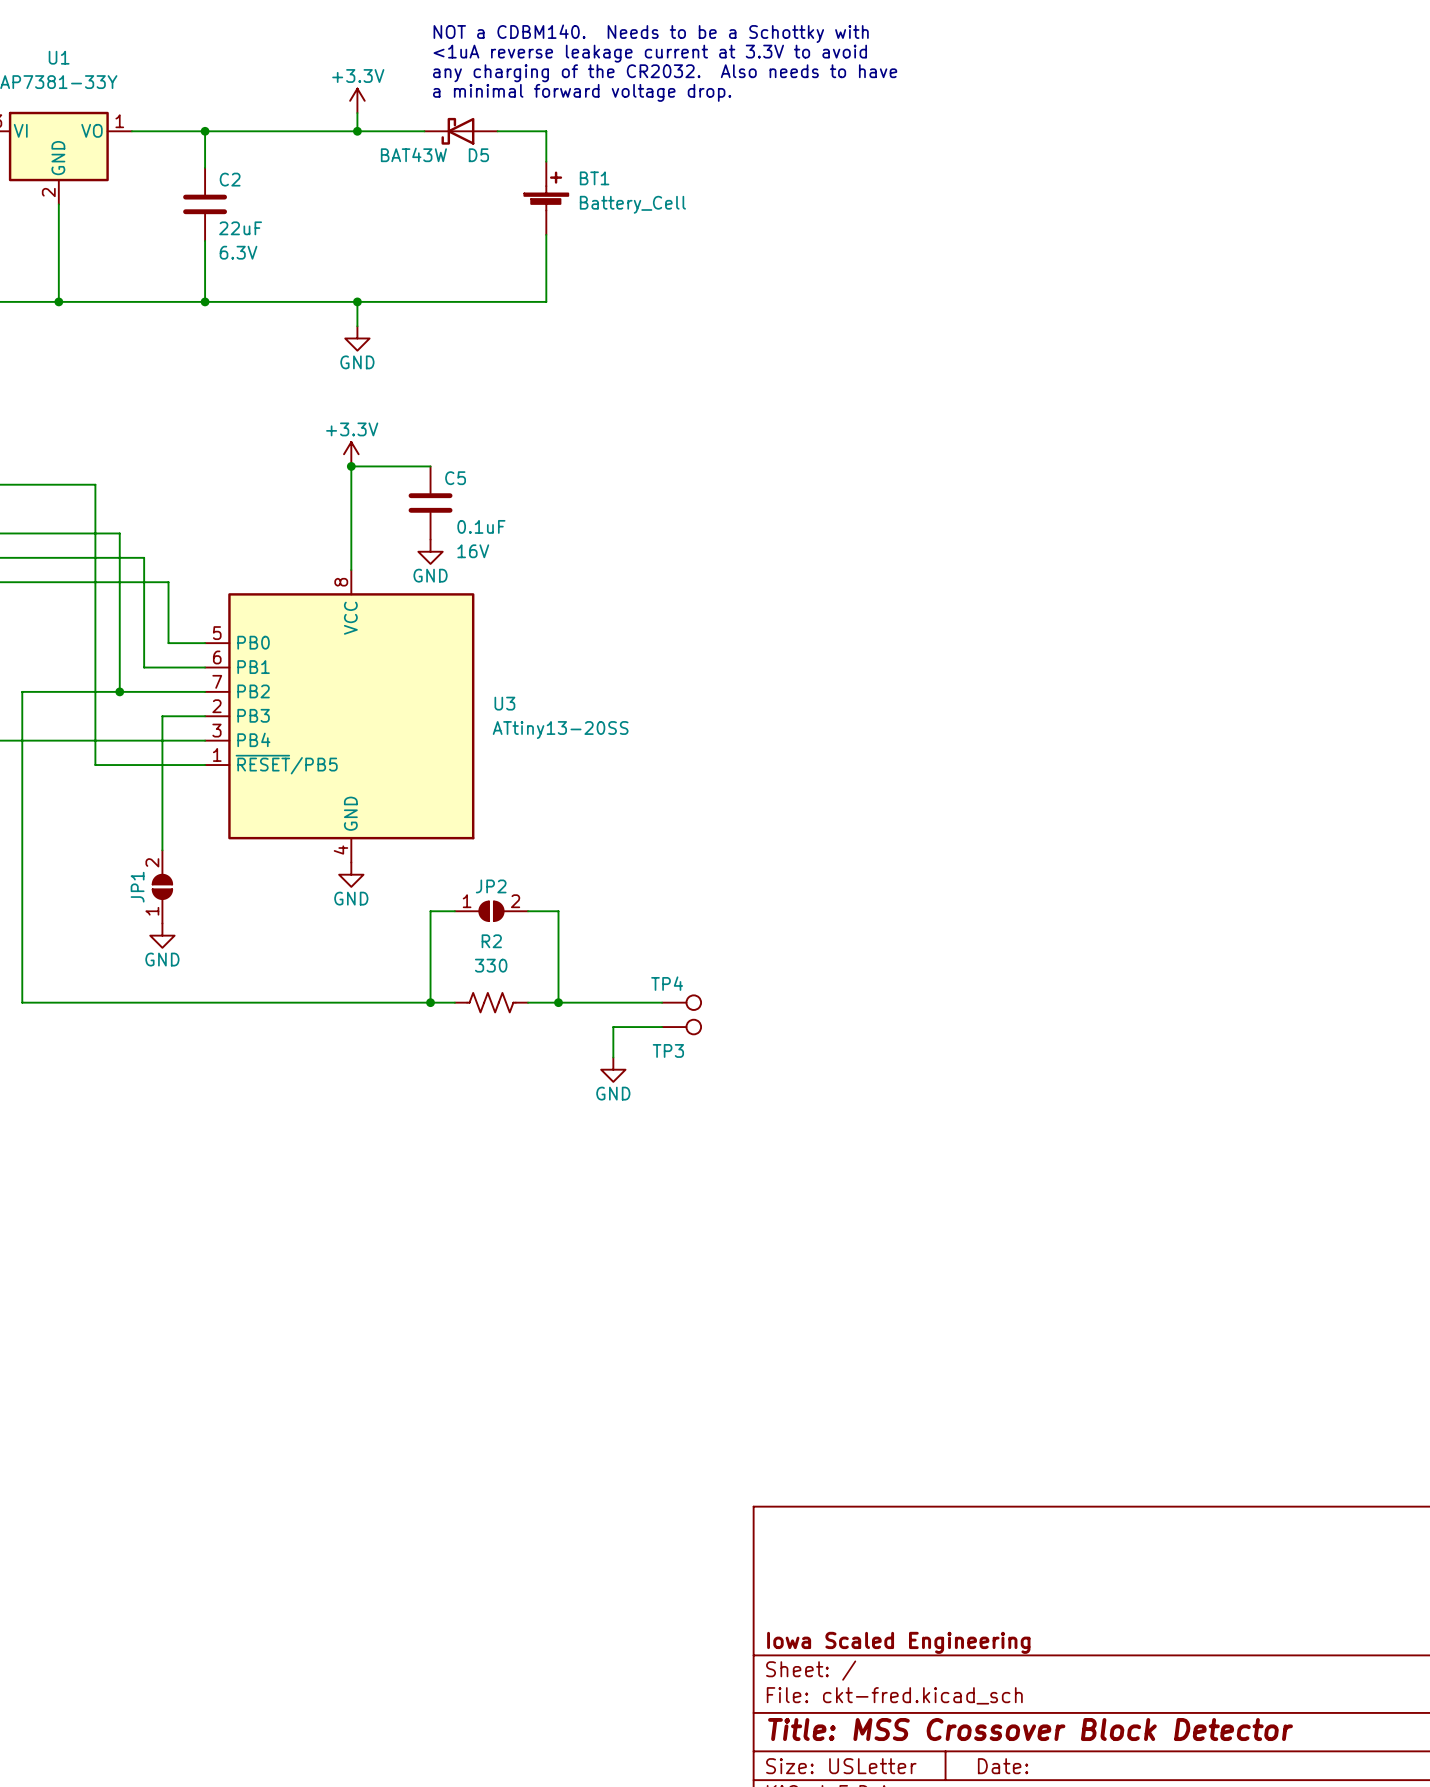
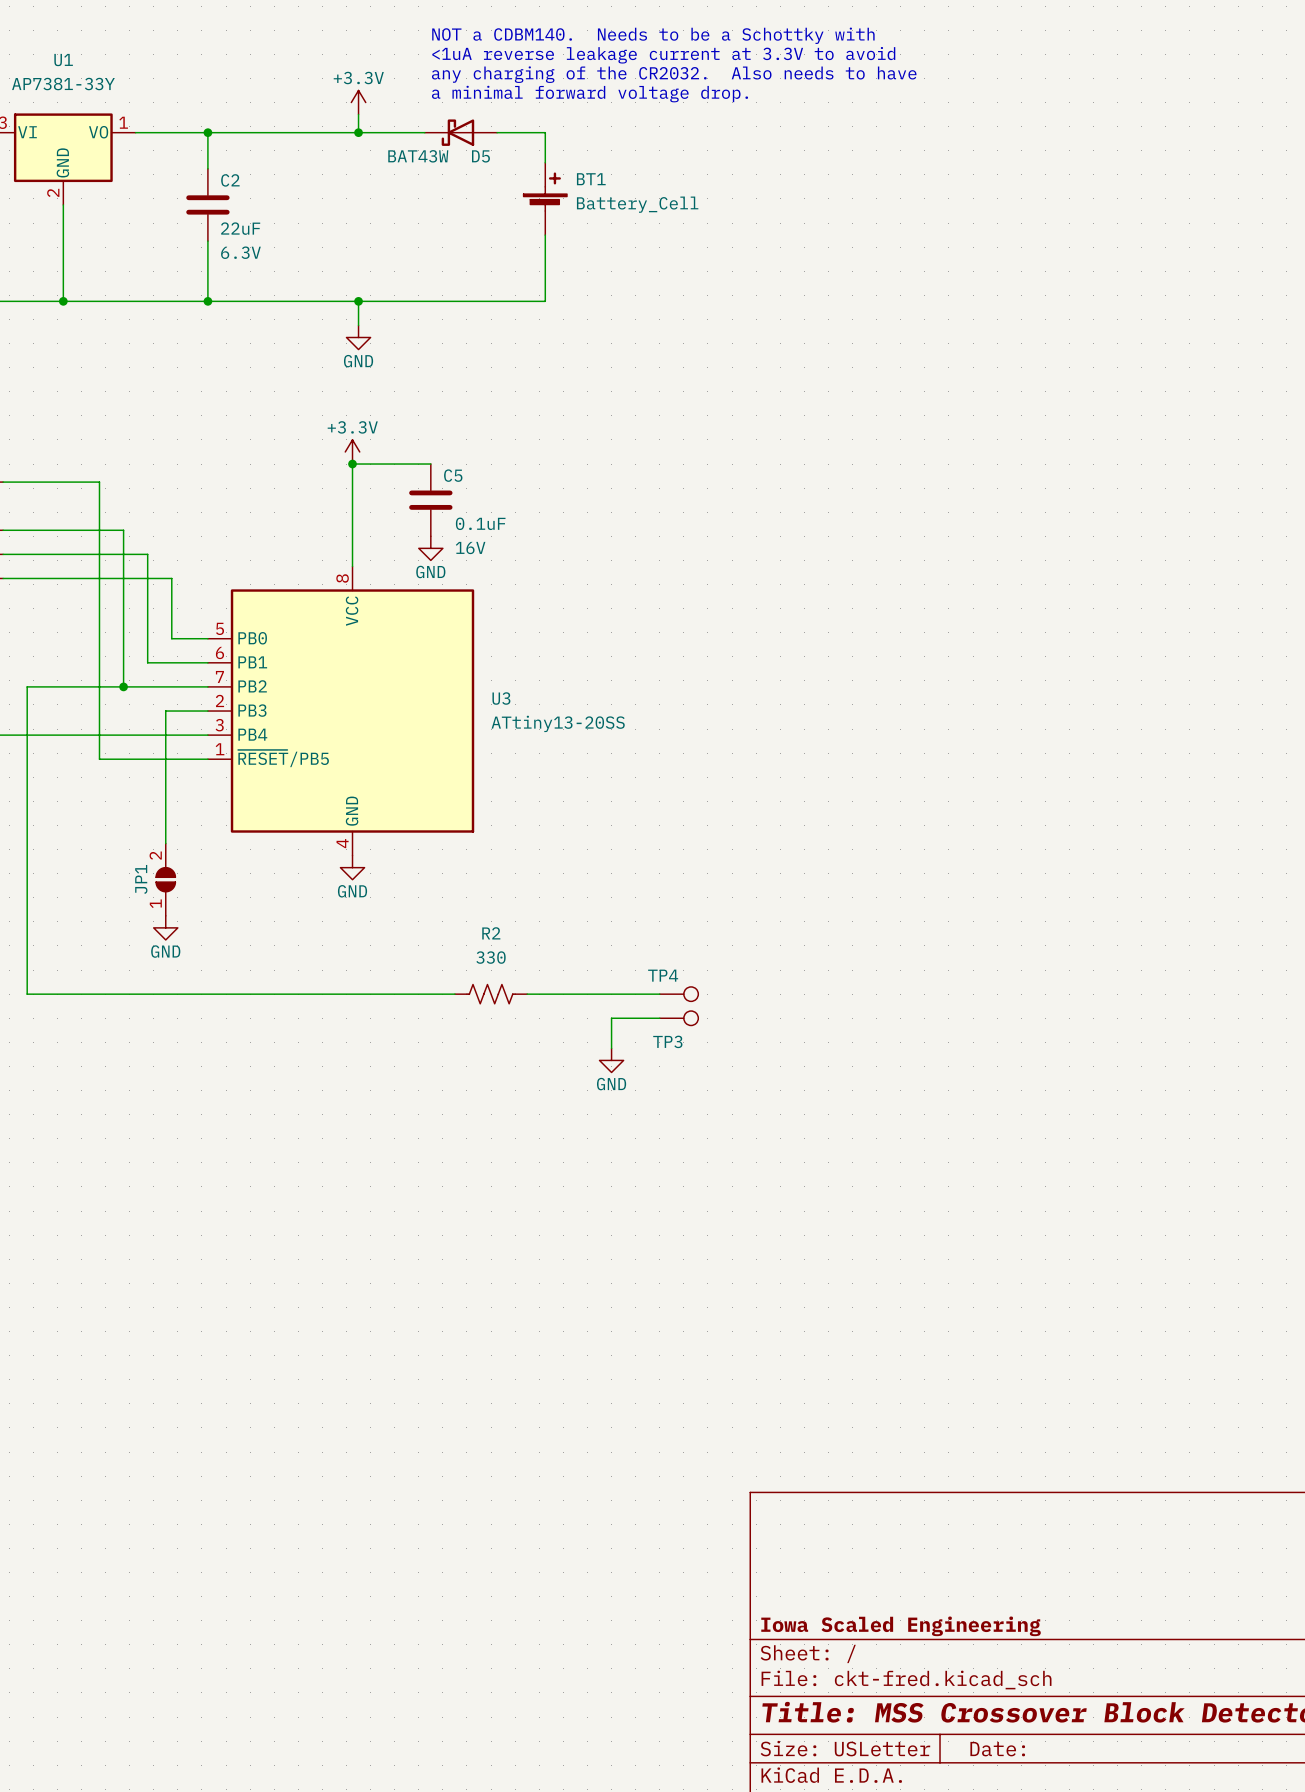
wire: (454, 911) (430, 911) (430, 1002) -> none
JP2: (491, 911) -> none
wire: (528, 911) (558, 911) (558, 1002) -> none
junction: (430, 1002) -> none
junction: (558, 1002) -> none

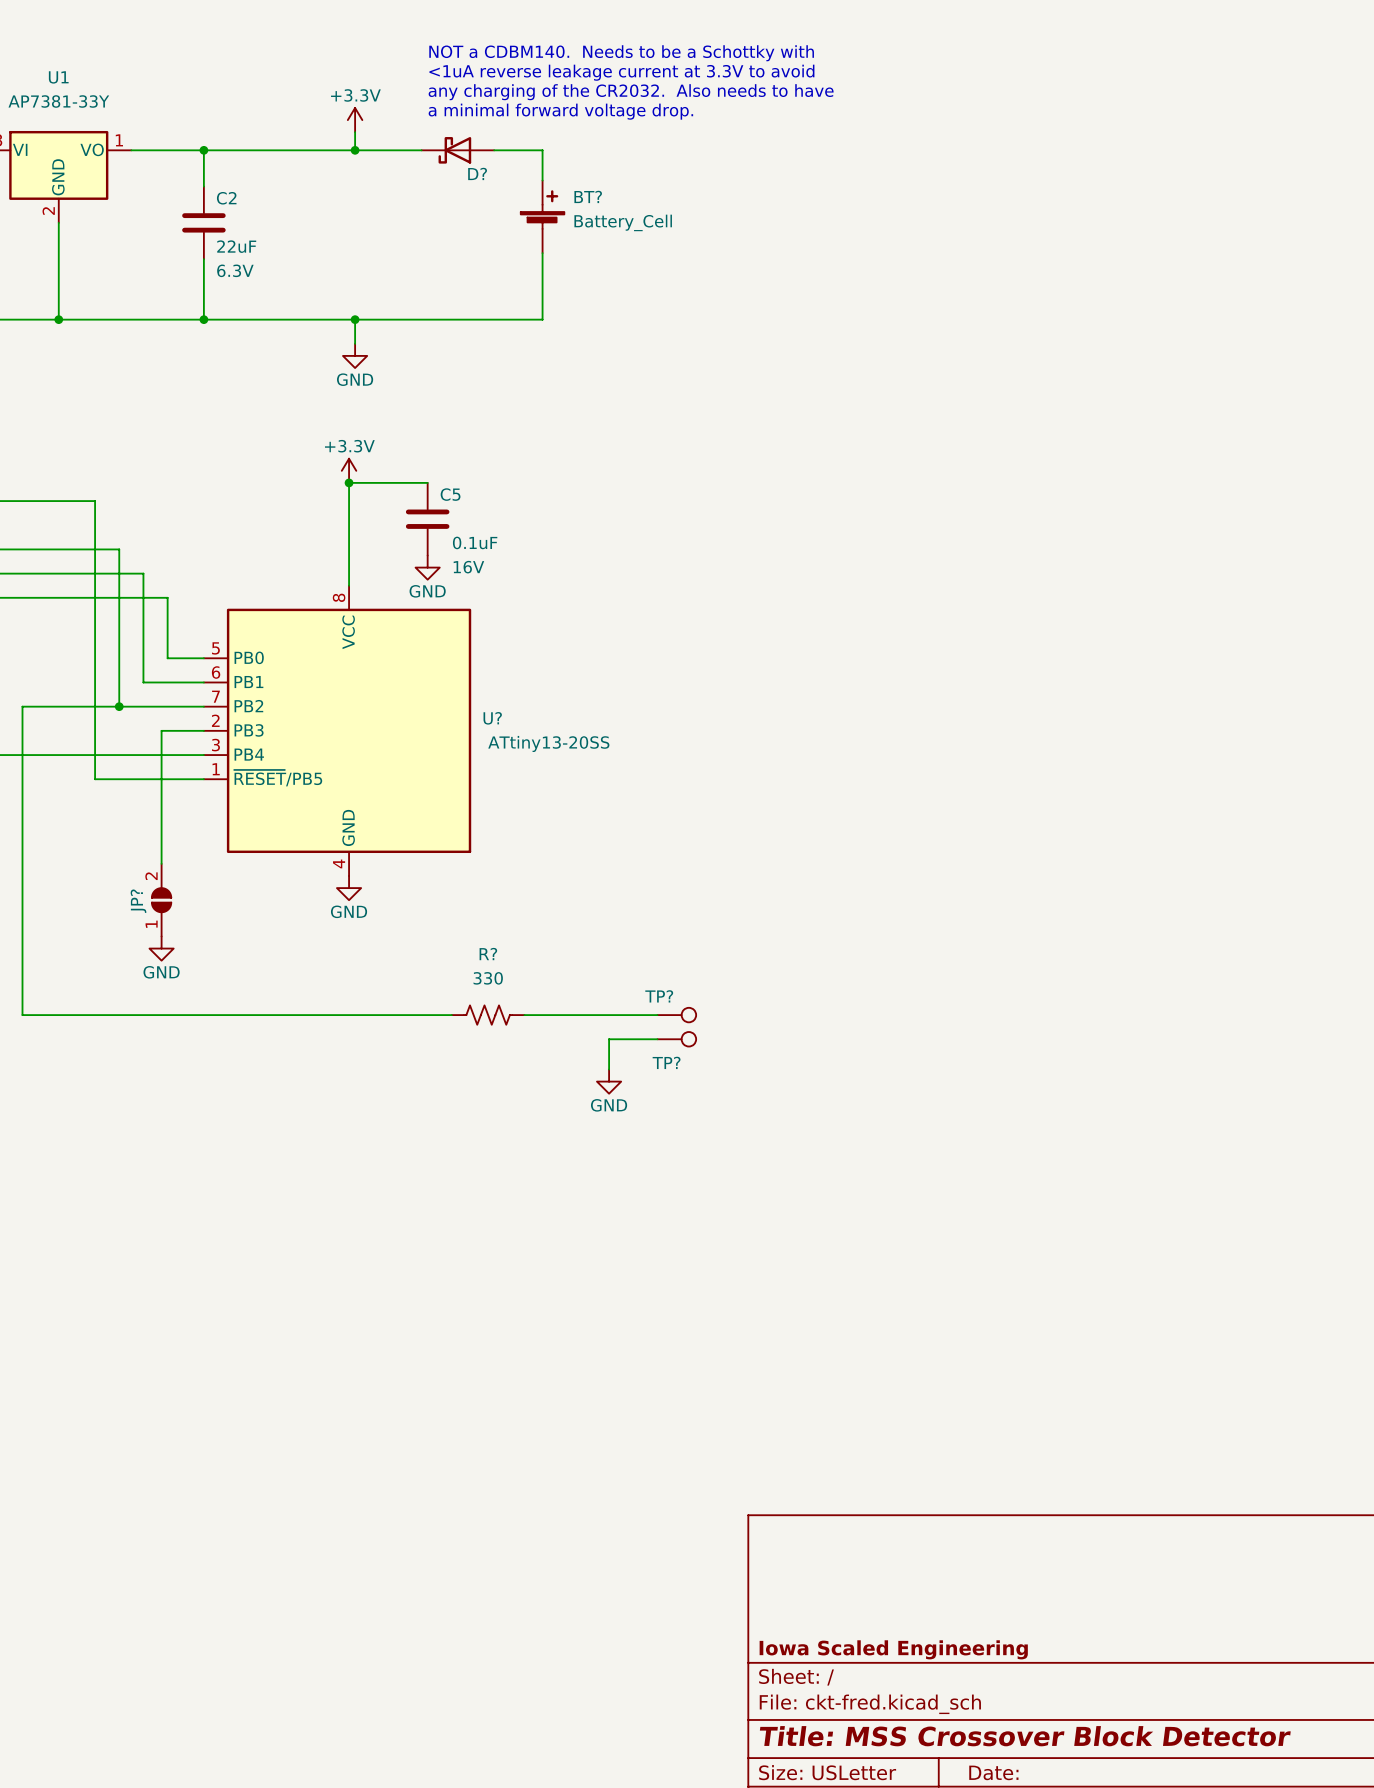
D5 value: BAT43W (418, 156) -> none
D5 name: D5 (480, 156) -> D? (477, 173)
BT1 name: BT1 (591, 179) -> BT? (588, 196)
U3 name: U3 (501, 698) -> U? (492, 718)
JP1 name: JP1 (141, 879) -> JP? (138, 901)
R2 name: R2 (491, 933) -> R? (488, 954)
TP4 name: TP4 (663, 975) -> TP? (659, 996)
TP3 name: TP3 (667, 1041) -> TP? (666, 1062)

